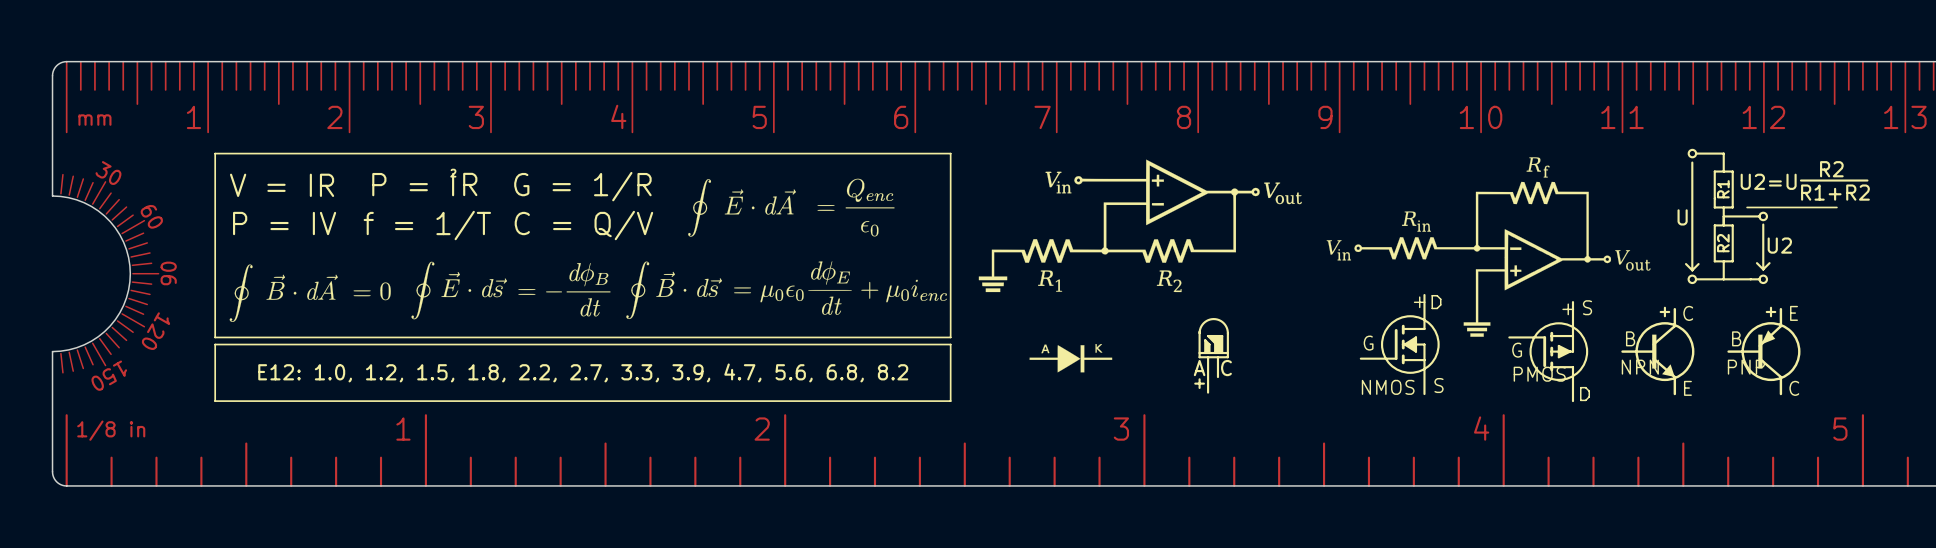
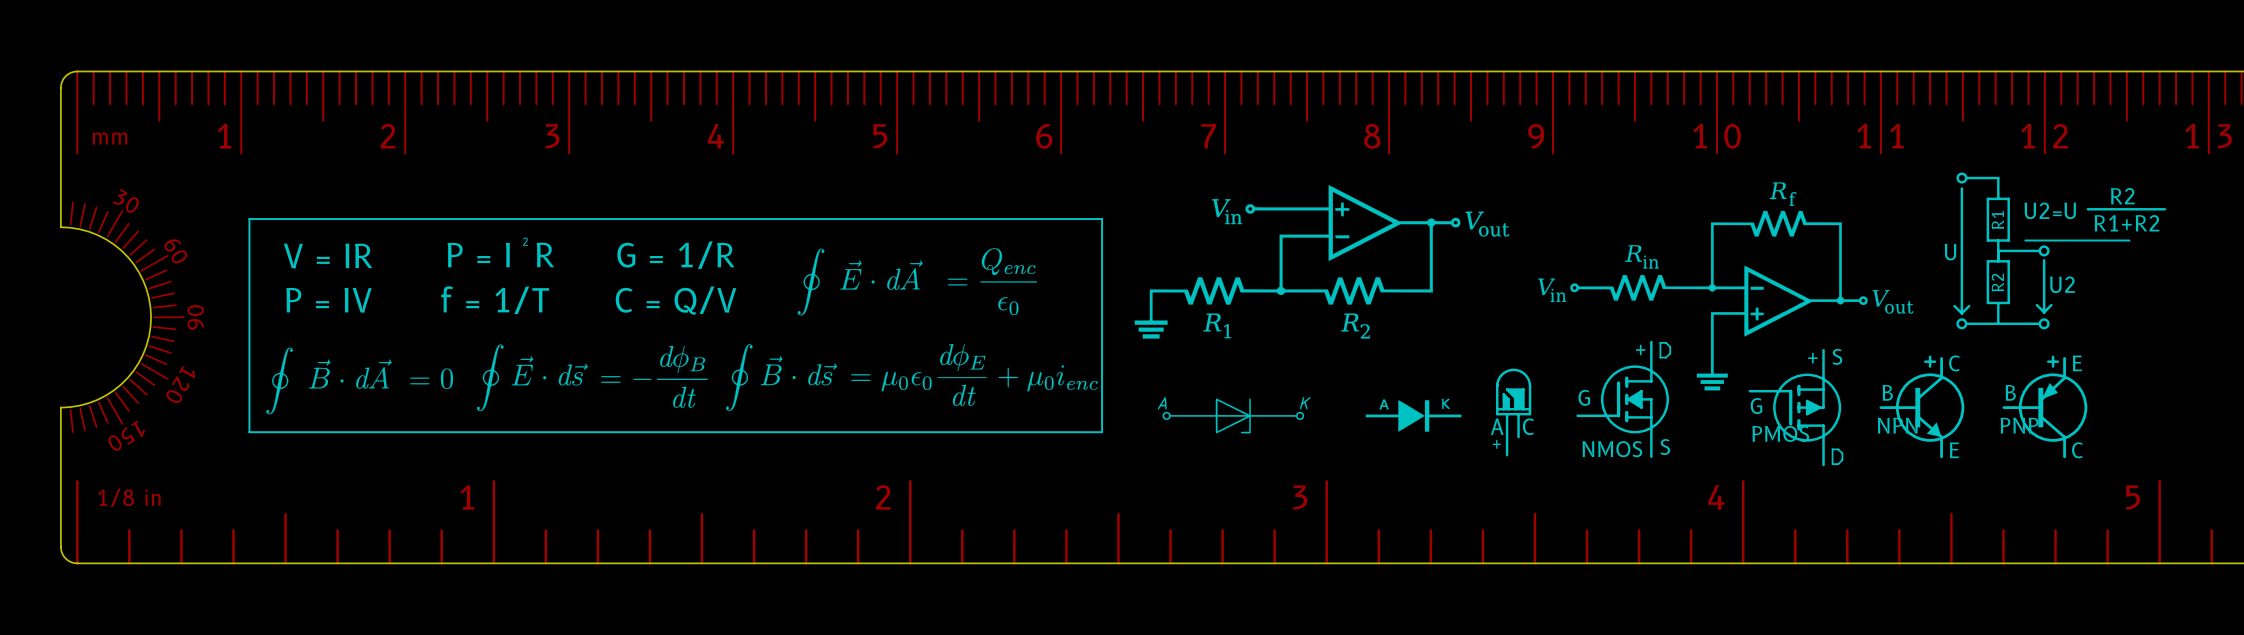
drawing position: (582, 245) -> (675, 325)
drawing: none -> [1157, 397, 1311, 434]
line: (215, 344) (215, 401) (950, 401) (950, 344) (215, 344) -> none
drawing position: (1213, 355) -> (1513, 412)
drawing position: (1070, 358) -> (1413, 415)
text: E12: 1.0, 1.2, 1.5, 1.8, 2.2, 2.7, 3.3, 3.9, 4.7, 5.6, 6.8, 8.2 (583, 372) -> none

